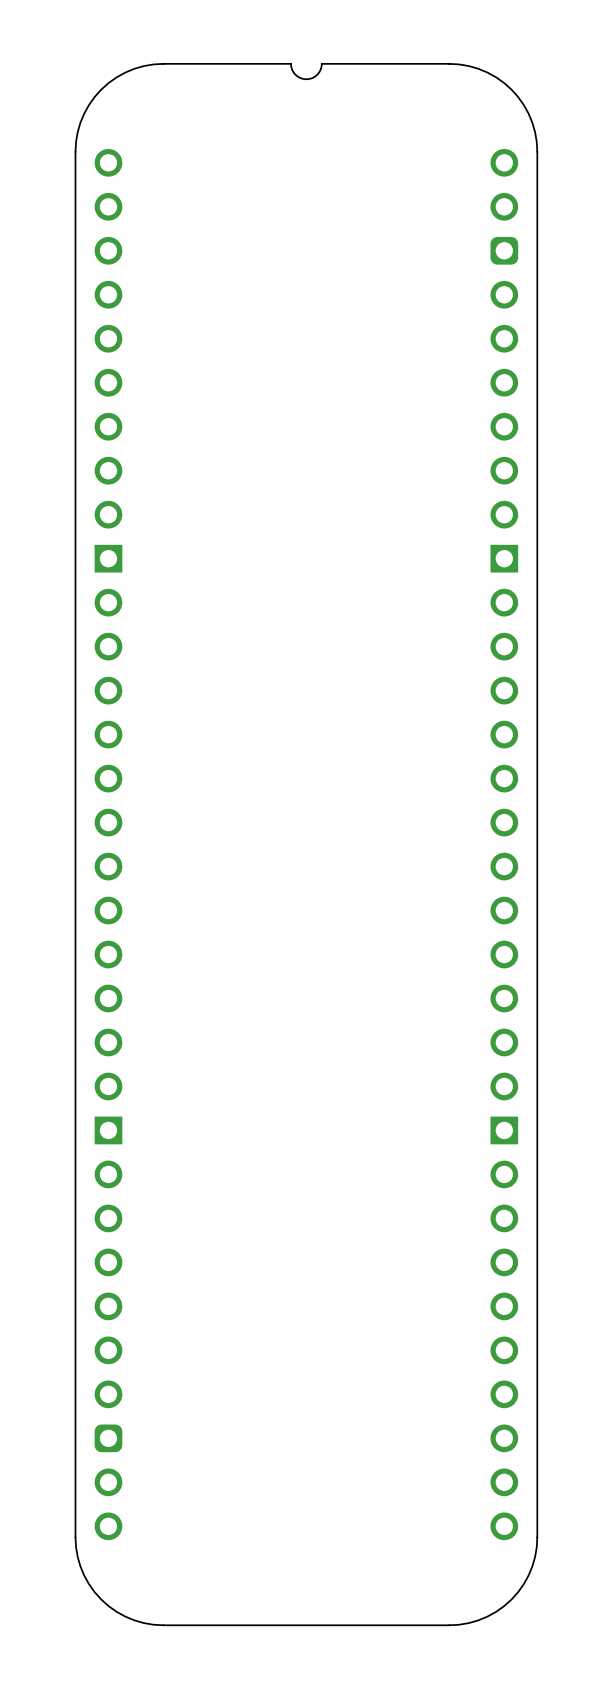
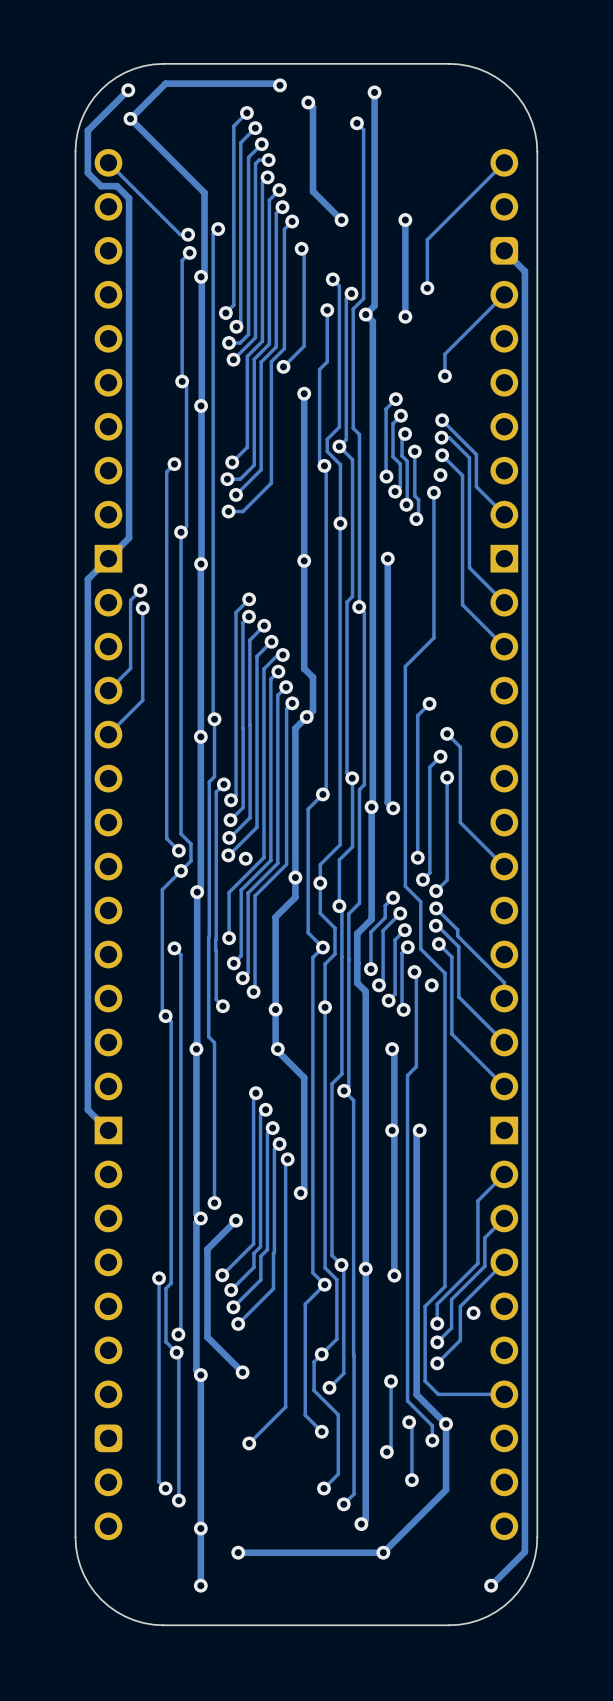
part footprint: [74, 62, 539, 1627] -> [74, 62, 539, 1627]
track: none -> (280, 85) (278, 83) (165, 83) (130, 118) (204, 192) (204, 273) (201, 276) (200, 888) (197, 892) (196, 1043) (196, 1214) (200, 1218) (196, 1222) (196, 1370) (200, 1375) (200, 1585)
via: none -> (280, 85)
track: none -> (128, 90) (87, 130) (87, 173) (101, 186) (117, 186) (129, 198) (129, 538) (87, 579) (87, 1109) (108, 1130)
via: none -> (128, 90)
track: none -> (374, 92) (374, 305) (365, 314) (372, 321) (371, 919) (357, 933) (357, 963)
via: none -> (374, 92)
track: none -> (308, 102) (313, 107) (313, 191) (341, 220)
via: none -> (308, 102)
track: none -> (246, 112) (233, 126) (233, 305) (225, 313)
via: none -> (246, 112)
via: none -> (130, 118)
track: none -> (356, 123) (363, 129) (363, 298) (353, 309) (353, 428) (359, 434) (359, 607) (364, 612) (364, 784) (359, 789) (359, 903) (348, 913) (348, 959)
via: none -> (356, 123)
track: none -> (255, 128) (240, 142) (240, 322) (236, 326)
via: none -> (255, 128)
track: none -> (261, 144) (248, 157) (248, 334) (240, 342) (229, 342)
via: none -> (261, 144)
track: none -> (268, 160) (259, 160) (255, 163) (255, 337) (233, 359)
via: none -> (268, 160)
track: none -> (108, 162) (180, 234) (188, 234)
track: none -> (504, 162) (427, 239) (427, 288)
track: none -> (267, 177) (262, 182) (262, 341) (247, 356) (247, 447) (232, 462)
via: none -> (267, 177)
track: none -> (279, 190) (269, 200) (269, 344) (254, 359) (254, 465) (240, 479) (227, 479)
via: none -> (279, 190)
track: none -> (282, 207) (276, 213) (276, 347) (261, 362) (261, 469) (236, 494)
via: none -> (282, 207)
via: none -> (341, 220)
track: none -> (405, 220) (405, 316)
via: none -> (405, 220)
track: none -> (292, 221) (284, 229) (284, 348) (271, 361) (271, 483) (242, 511) (228, 511)
via: none -> (292, 221)
track: none -> (218, 229) (213, 234) (214, 776) (209, 781) (208, 1036) (214, 1042) (214, 1203)
via: none -> (218, 229)
via: none -> (188, 234)
track: none -> (301, 248) (304, 251) (304, 346) (283, 366)
via: none -> (301, 248)
track: none -> (504, 250) (524, 271) (524, 1551) (491, 1585)
track: none -> (189, 252) (182, 260) (182, 381) (186, 385) (186, 526) (181, 532) (181, 834) (190, 843) (190, 861) (162, 889) (162, 1012) (171, 1021) (171, 1283) (165, 1288) (165, 1341) (178, 1354) (178, 1500)
via: none -> (189, 252)
via: none -> (201, 276)
track: none -> (332, 279) (339, 285) (339, 427) (327, 439) (327, 451) (340, 464) (340, 844) (320, 864) (320, 913) (334, 928) (334, 954) (325, 964) (325, 1267) (336, 1279) (336, 1339) (314, 1361) (314, 1390) (338, 1414) (338, 1474) (323, 1488)
via: none -> (332, 279)
via: none -> (427, 288)
track: none -> (351, 293) (346, 298) (346, 439) (339, 446) (352, 459) (352, 596) (347, 602) (347, 773) (352, 778) (352, 846) (339, 859) (341, 957)
via: none -> (351, 293)
track: none -> (504, 294) (444, 354) (444, 376)
track: none -> (327, 310) (327, 361) (319, 369) (319, 461) (326, 467) (326, 791) (308, 809) (308, 932) (322, 947) (312, 957) (312, 1272) (324, 1284) (305, 1304) (305, 1415) (321, 1431)
via: none -> (327, 310)
via: none -> (225, 313)
via: none -> (365, 314)
via: none -> (405, 316)
via: none -> (236, 326)
via: none -> (229, 342)
via: none -> (233, 359)
via: none -> (283, 366)
via: none -> (444, 376)
via: none -> (182, 381)
track: none -> (304, 393) (304, 668) (313, 677) (313, 710) (295, 728) (295, 897) (275, 917) (275, 1049) (304, 1077) (304, 1189) (300, 1193)
via: none -> (304, 393)
track: none -> (395, 399) (386, 408) (386, 476)
via: none -> (395, 399)
via: none -> (201, 405)
track: none -> (400, 415) (393, 423) (393, 456) (400, 464) (400, 486) (395, 491)
via: none -> (400, 415)
track: none -> (442, 420) (476, 454) (476, 486) (504, 514)
via: none -> (442, 420)
track: none -> (405, 433) (402, 437) (402, 455) (407, 461) (406, 504)
via: none -> (405, 433)
track: none -> (441, 437) (449, 437) (469, 457) (469, 567) (504, 602)
via: none -> (441, 437)
via: none -> (339, 446)
track: none -> (414, 451) (414, 496) (418, 499) (418, 516) (416, 519)
via: none -> (414, 451)
track: none -> (442, 455) (462, 475) (462, 604) (504, 646)
via: none -> (442, 455)
via: none -> (232, 462)
track: none -> (174, 464) (166, 471) (166, 838) (178, 850)
via: none -> (174, 464)
via: none -> (324, 465)
via: none -> (440, 475)
via: none -> (386, 476)
via: none -> (227, 479)
via: none -> (395, 491)
track: none -> (433, 492) (433, 637) (405, 666) (405, 886) (420, 901) (420, 949) (444, 973) (444, 1286) (425, 1306) (425, 1381) (438, 1394) (504, 1394)
via: none -> (433, 492)
via: none -> (236, 494)
via: none -> (406, 504)
via: none -> (228, 511)
via: none -> (416, 519)
via: none -> (340, 523)
via: none -> (181, 532)
track: none -> (387, 558) (387, 802) (393, 808)
via: none -> (387, 558)
via: none -> (304, 560)
via: none -> (201, 564)
track: none -> (140, 590) (130, 600) (130, 668) (108, 690)
via: none -> (140, 590)
track: none -> (249, 599) (236, 612) (236, 795) (231, 800)
via: none -> (249, 599)
via: none -> (359, 607)
track: none -> (142, 608) (142, 700) (108, 734)
via: none -> (142, 608)
track: none -> (248, 616) (242, 622) (242, 728)
via: none -> (248, 616)
track: none -> (264, 625) (249, 640) (249, 725)
via: none -> (264, 625)
track: none -> (271, 641) (257, 656) (257, 827) (228, 855)
via: none -> (271, 641)
track: none -> (282, 654) (277, 654) (263, 668) (263, 857) (229, 892) (229, 938)
via: none -> (282, 654)
track: none -> (278, 671) (270, 679) (270, 860) (241, 890) (241, 955) (233, 963)
via: none -> (278, 671)
track: none -> (286, 687) (277, 695) (277, 863) (248, 893) (248, 972) (242, 978)
via: none -> (286, 687)
track: none -> (292, 703) (286, 709) (286, 864) (255, 895) (253, 991)
via: none -> (292, 703)
track: none -> (429, 703) (417, 715) (417, 857)
via: none -> (429, 703)
via: none -> (306, 717)
via: none -> (214, 719)
track: none -> (250, 725) (250, 817) (229, 837)
track: none -> (243, 728) (243, 807) (230, 820)
track: none -> (447, 733) (460, 747) (460, 822) (504, 866)
via: none -> (447, 733)
via: none -> (200, 736)
track: none -> (440, 756) (429, 767) (429, 872) (422, 879)
via: none -> (440, 756)
track: none -> (447, 777) (447, 880) (436, 891)
via: none -> (447, 777)
via: none -> (352, 778)
track: none -> (223, 784) (216, 792) (216, 999) (222, 1006)
via: none -> (223, 784)
via: none -> (322, 794)
via: none -> (231, 800)
via: none -> (371, 807)
via: none -> (393, 808)
via: none -> (230, 820)
via: none -> (229, 837)
via: none -> (178, 850)
via: none -> (228, 855)
via: none -> (417, 857)
via: none -> (245, 858)
via: none -> (181, 870)
via: none -> (295, 877)
via: none -> (422, 879)
via: none -> (320, 883)
via: none -> (436, 891)
via: none -> (197, 892)
track: none -> (393, 897) (385, 905) (385, 917) (370, 931) (370, 969)
via: none -> (393, 897)
via: none -> (339, 906)
track: none -> (436, 908) (457, 929) (457, 936) (504, 982) (504, 998)
via: none -> (436, 908)
track: none -> (400, 913) (383, 930) (383, 981) (378, 985)
via: none -> (400, 913)
track: none -> (435, 925) (458, 946) (458, 996) (504, 1042)
via: none -> (435, 925)
track: none -> (404, 930) (395, 939) (395, 994) (388, 1000)
via: none -> (404, 930)
via: none -> (229, 938)
track: none -> (438, 944) (451, 957) (451, 1034) (504, 1086)
via: none -> (438, 944)
via: none -> (322, 947)
track: none -> (407, 947) (402, 953) (402, 1008) (403, 1009)
via: none -> (407, 947)
track: none -> (174, 948) (180, 954) (180, 1332) (178, 1334)
via: none -> (174, 948)
track: none -> (341, 957) (341, 1073) (331, 1083) (331, 1255) (343, 1267) (343, 1373) (329, 1387)
track: none -> (348, 959) (348, 1086) (344, 1090) (353, 1100) (354, 1494) (343, 1504)
via: none -> (233, 963)
track: none -> (357, 963) (357, 982) (365, 991) (365, 1519) (361, 1524)
via: none -> (370, 969)
track: none -> (414, 972) (416, 973) (416, 1066) (407, 1075) (407, 1400) (432, 1425) (432, 1440)
via: none -> (414, 972)
via: none -> (242, 978)
via: none -> (378, 985)
via: none -> (431, 985)
via: none -> (253, 991)
via: none -> (388, 1000)
via: none -> (222, 1006)
via: none -> (325, 1007)
via: none -> (275, 1009)
via: none -> (403, 1009)
via: none -> (165, 1016)
via: none -> (196, 1049)
via: none -> (277, 1049)
track: none -> (392, 1049) (394, 1051) (394, 1128) (392, 1130) (394, 1132) (394, 1275)
via: none -> (392, 1049)
via: none -> (344, 1090)
track: none -> (255, 1093) (253, 1095) (253, 1243) (222, 1275)
via: none -> (255, 1093)
track: none -> (265, 1109) (260, 1115) (260, 1246) (253, 1253) (253, 1267) (231, 1290)
via: none -> (265, 1109)
track: none -> (272, 1128) (267, 1133) (267, 1249) (260, 1256) (260, 1279) (233, 1307)
via: none -> (272, 1128)
via: none -> (392, 1130)
track: none -> (419, 1130) (416, 1133) (416, 1394) (446, 1424) (446, 1490) (383, 1552) (238, 1552)
via: none -> (419, 1130)
track: none -> (279, 1144) (274, 1149) (273, 1288) (238, 1323)
via: none -> (279, 1144)
track: none -> (287, 1159) (285, 1161) (285, 1407) (249, 1443)
via: none -> (287, 1159)
track: none -> (504, 1174) (477, 1200) (477, 1263) (437, 1304) (437, 1323)
via: none -> (300, 1193)
via: none -> (214, 1203)
via: none -> (200, 1218)
track: none -> (504, 1218) (484, 1237) (484, 1266) (451, 1299) (451, 1328) (437, 1342)
track: none -> (236, 1220) (207, 1249) (207, 1337) (242, 1372)
via: none -> (236, 1220)
track: none -> (504, 1262) (460, 1306) (460, 1340) (437, 1363)
via: none -> (341, 1264)
via: none -> (365, 1268)
via: none -> (222, 1275)
via: none -> (394, 1275)
track: none -> (159, 1278) (159, 1481) (165, 1488)
via: none -> (159, 1278)
via: none -> (324, 1284)
via: none -> (231, 1290)
via: none -> (233, 1307)
via: none -> (473, 1313)
via: none -> (238, 1323)
via: none -> (437, 1323)
via: none -> (178, 1334)
via: none -> (437, 1342)
via: none -> (176, 1352)
via: none -> (321, 1354)
via: none -> (437, 1363)
via: none -> (242, 1372)
via: none -> (200, 1375)
track: none -> (391, 1381) (391, 1447) (386, 1452)
via: none -> (391, 1381)
via: none -> (329, 1387)
track: none -> (409, 1422) (411, 1425) (411, 1480)
via: none -> (409, 1422)
via: none -> (446, 1424)
via: none -> (321, 1431)
via: none -> (432, 1440)
via: none -> (249, 1443)
via: none -> (386, 1452)
via: none -> (411, 1480)
via: none -> (165, 1488)
via: none -> (323, 1488)
via: none -> (178, 1500)
via: none -> (343, 1504)
via: none -> (361, 1524)
via: none -> (200, 1528)
via: none -> (238, 1552)
via: none -> (383, 1552)
via: none -> (200, 1585)
via: none -> (491, 1585)

